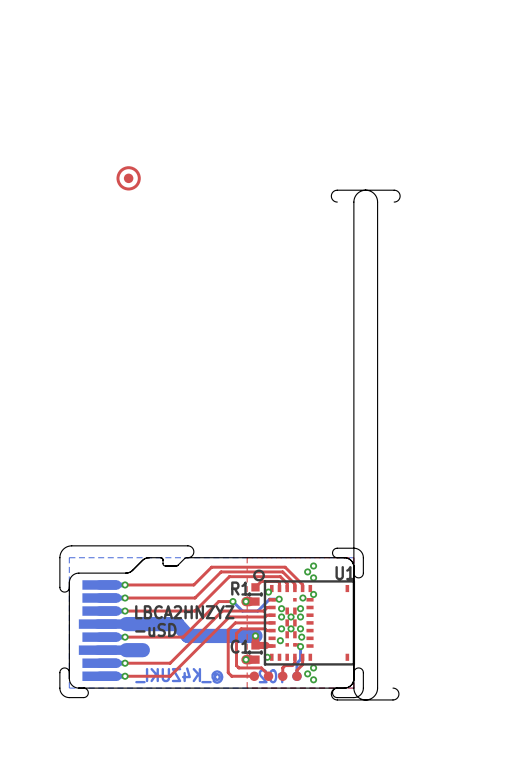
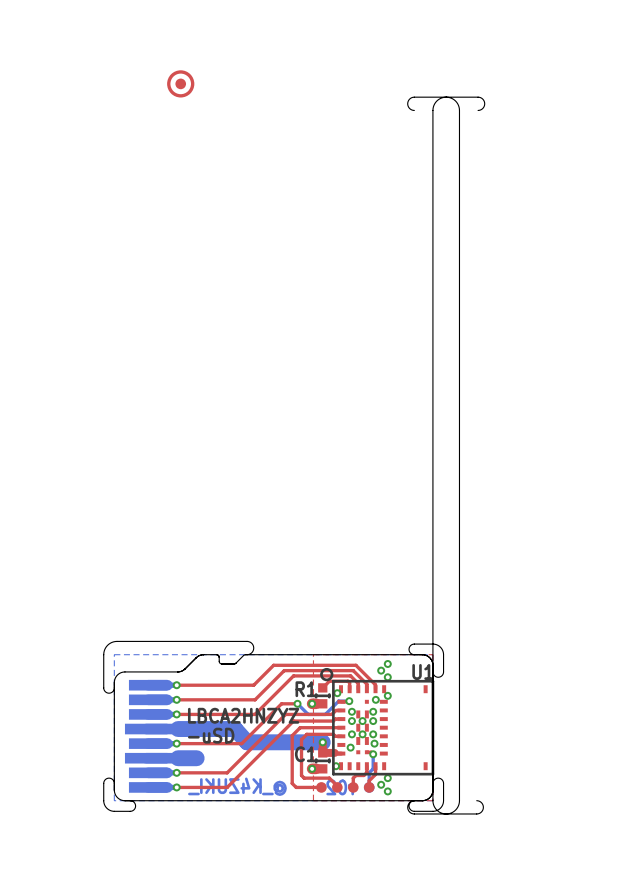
drawing position: (128, 178) -> (180, 83)
part position: (128, 178) -> (180, 83)
board edge: (337, 202) (333, 200) (331, 196) (333, 191) (337, 190) (395, 190) (400, 196) (394, 202) -> (414, 110) (409, 108) (407, 103) (409, 99) (414, 97) (479, 97) (483, 99) (484, 104) (482, 108) (478, 110)
board edge: (353, 202) (357, 193) (365, 190) (374, 193) (377, 202) -> (432, 256) (433, 108) (438, 99) (446, 97) (454, 99) (459, 108) (459, 256)

